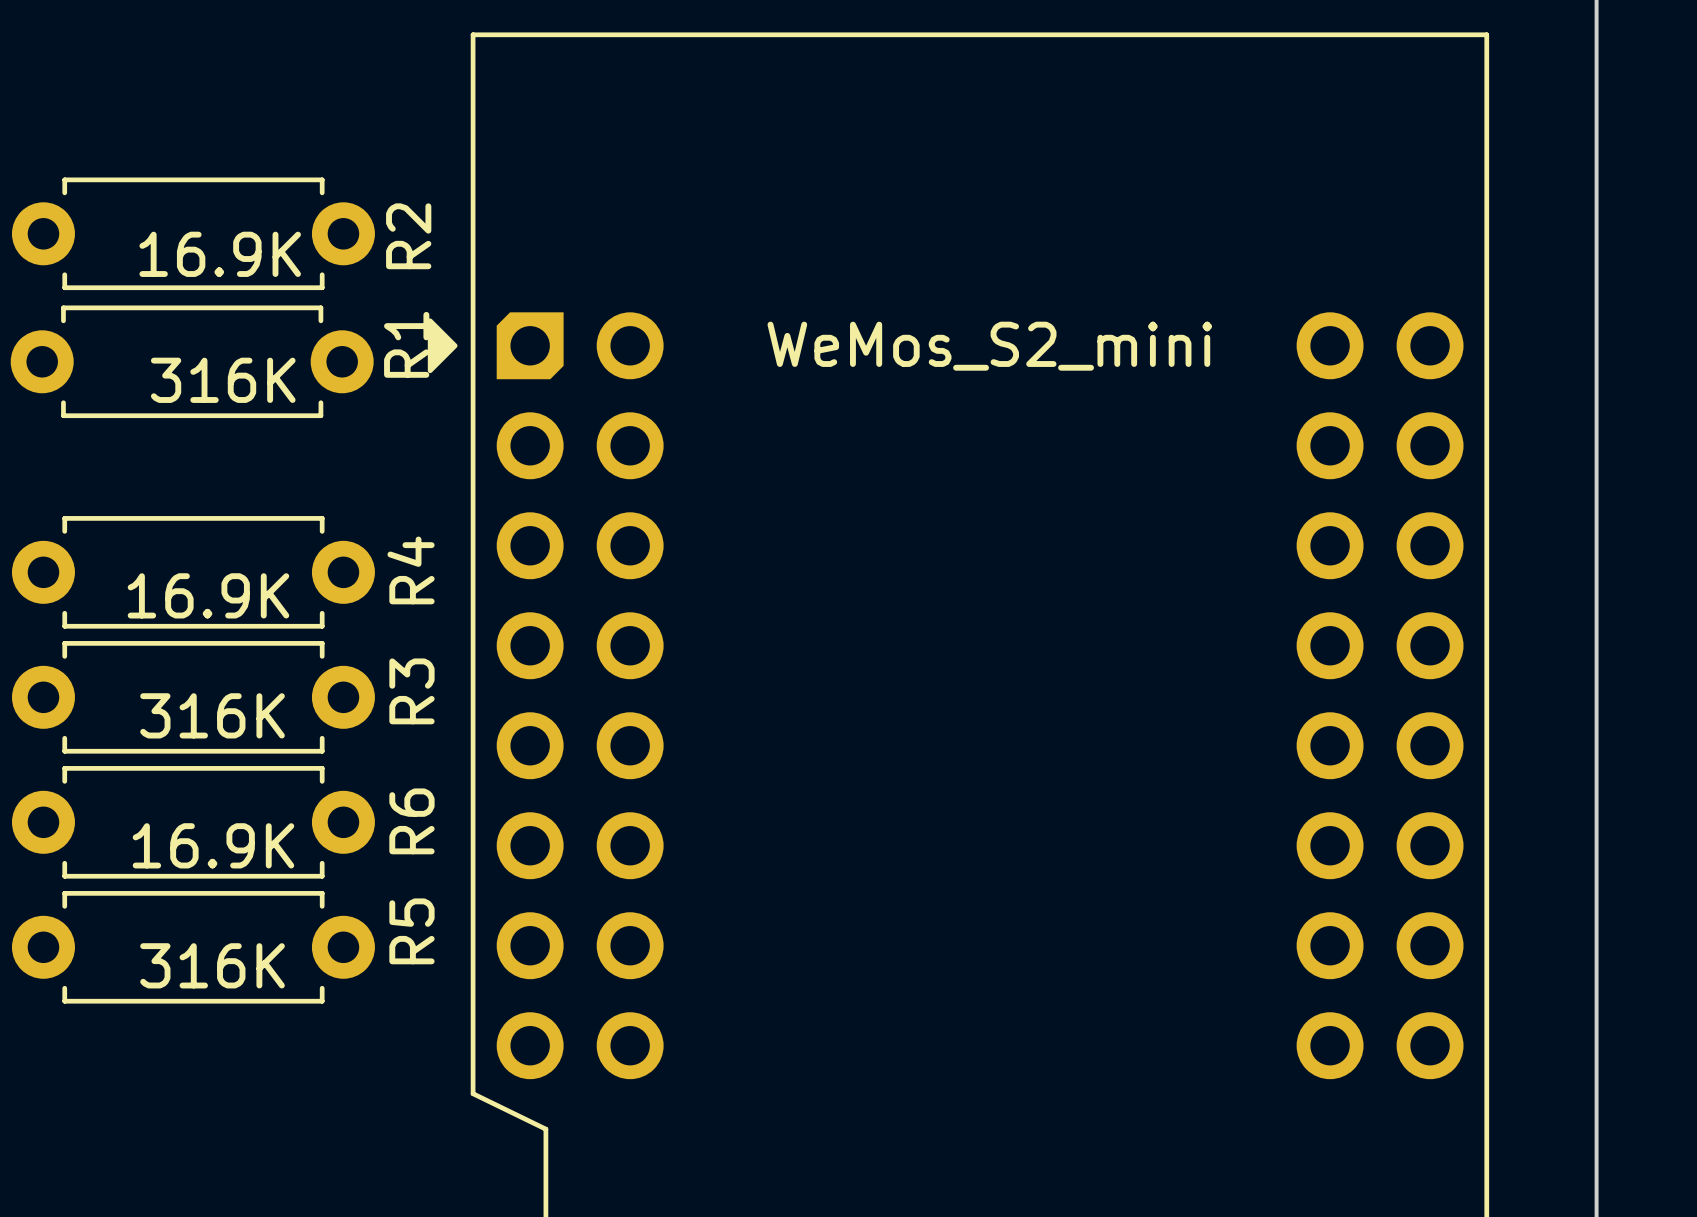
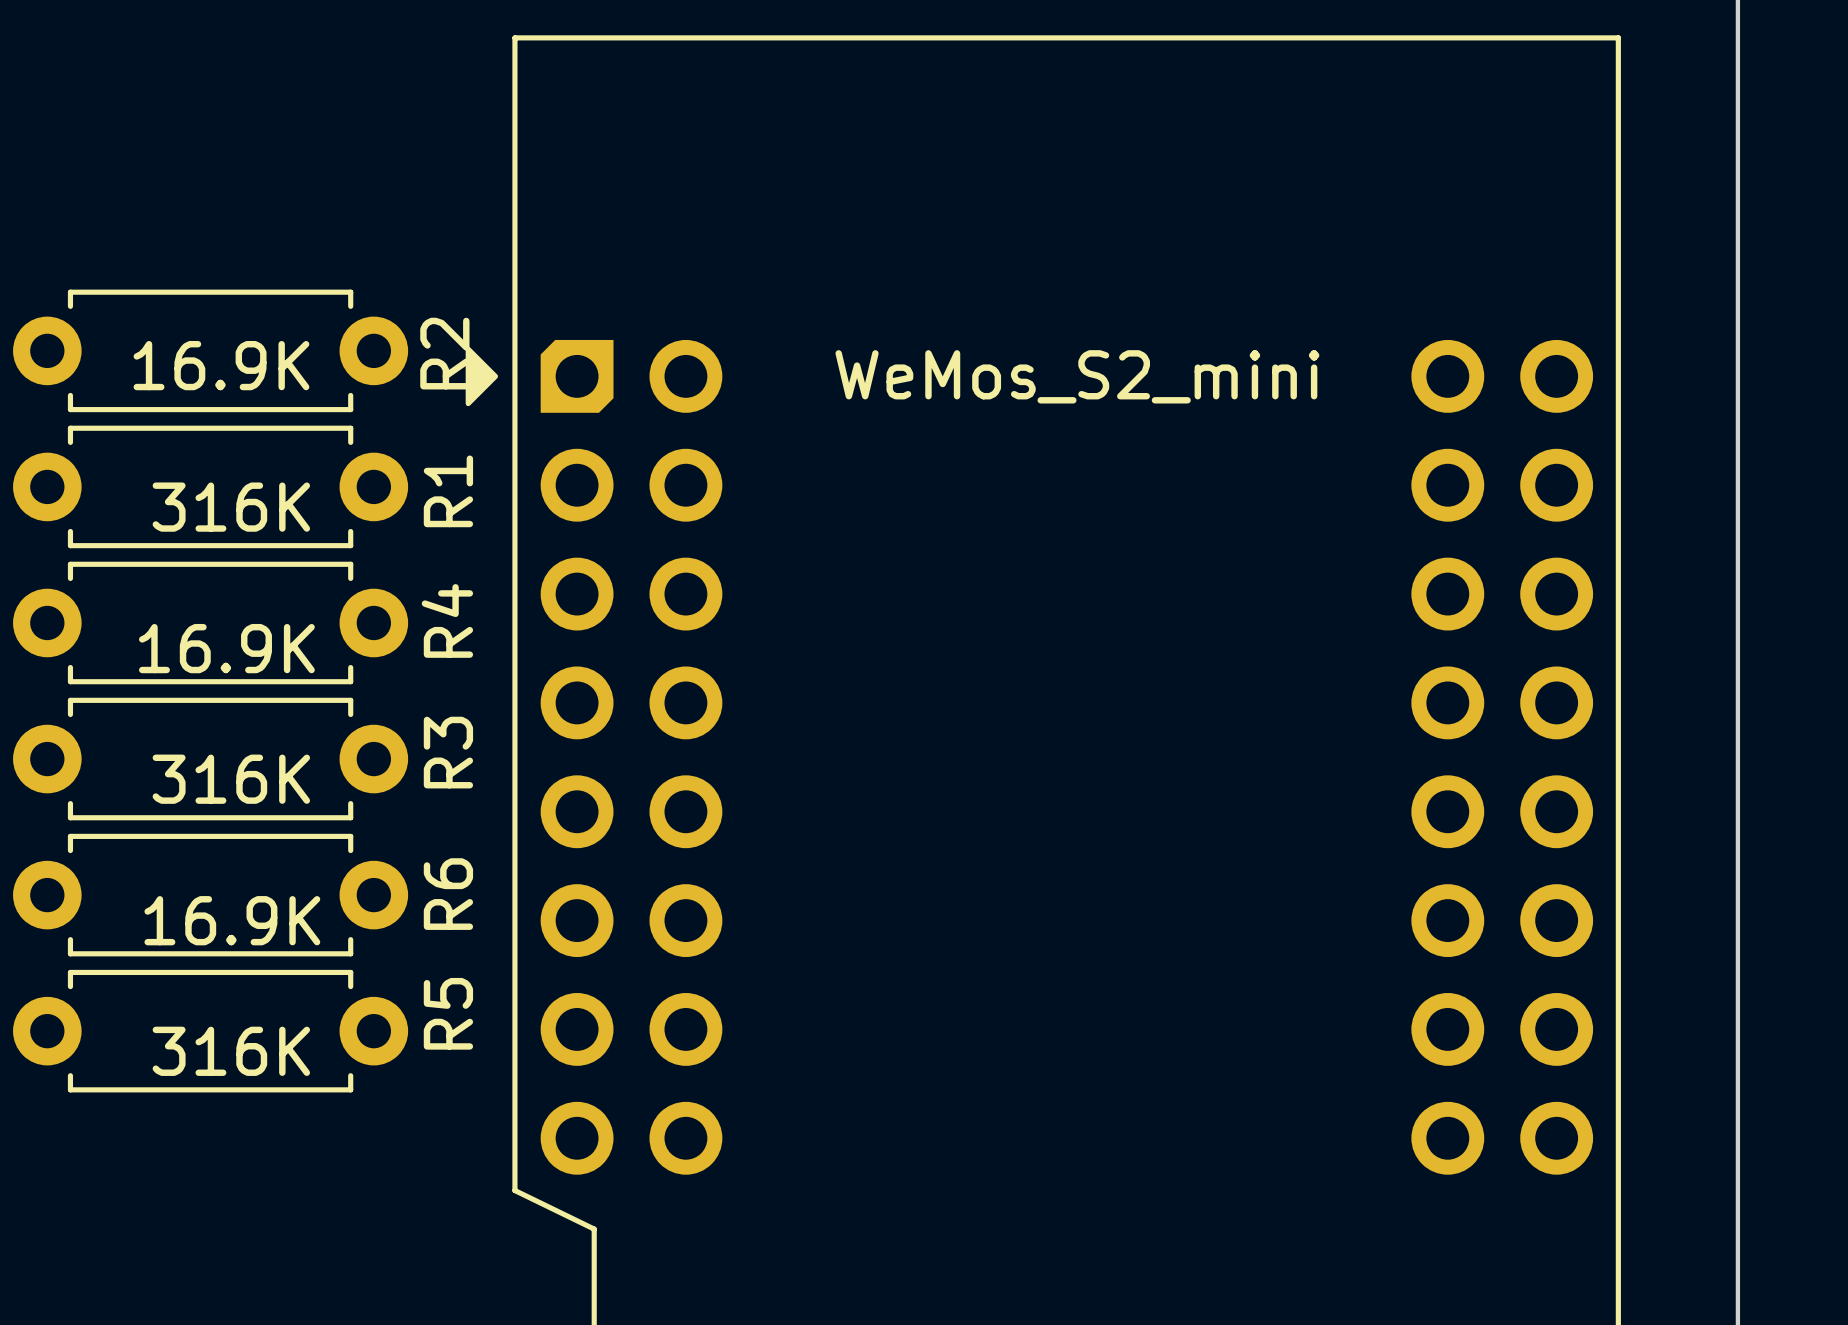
R2 position: (193, 233) -> (210, 350)
R2 value position: 16.9K (220, 254) -> 16.9K (221, 365)
R1 name position: R1 (406, 344) -> R1 (448, 491)
R1 position: (192, 361) -> (210, 486)
R1 value position: 316K (223, 380) -> 316K (231, 507)

